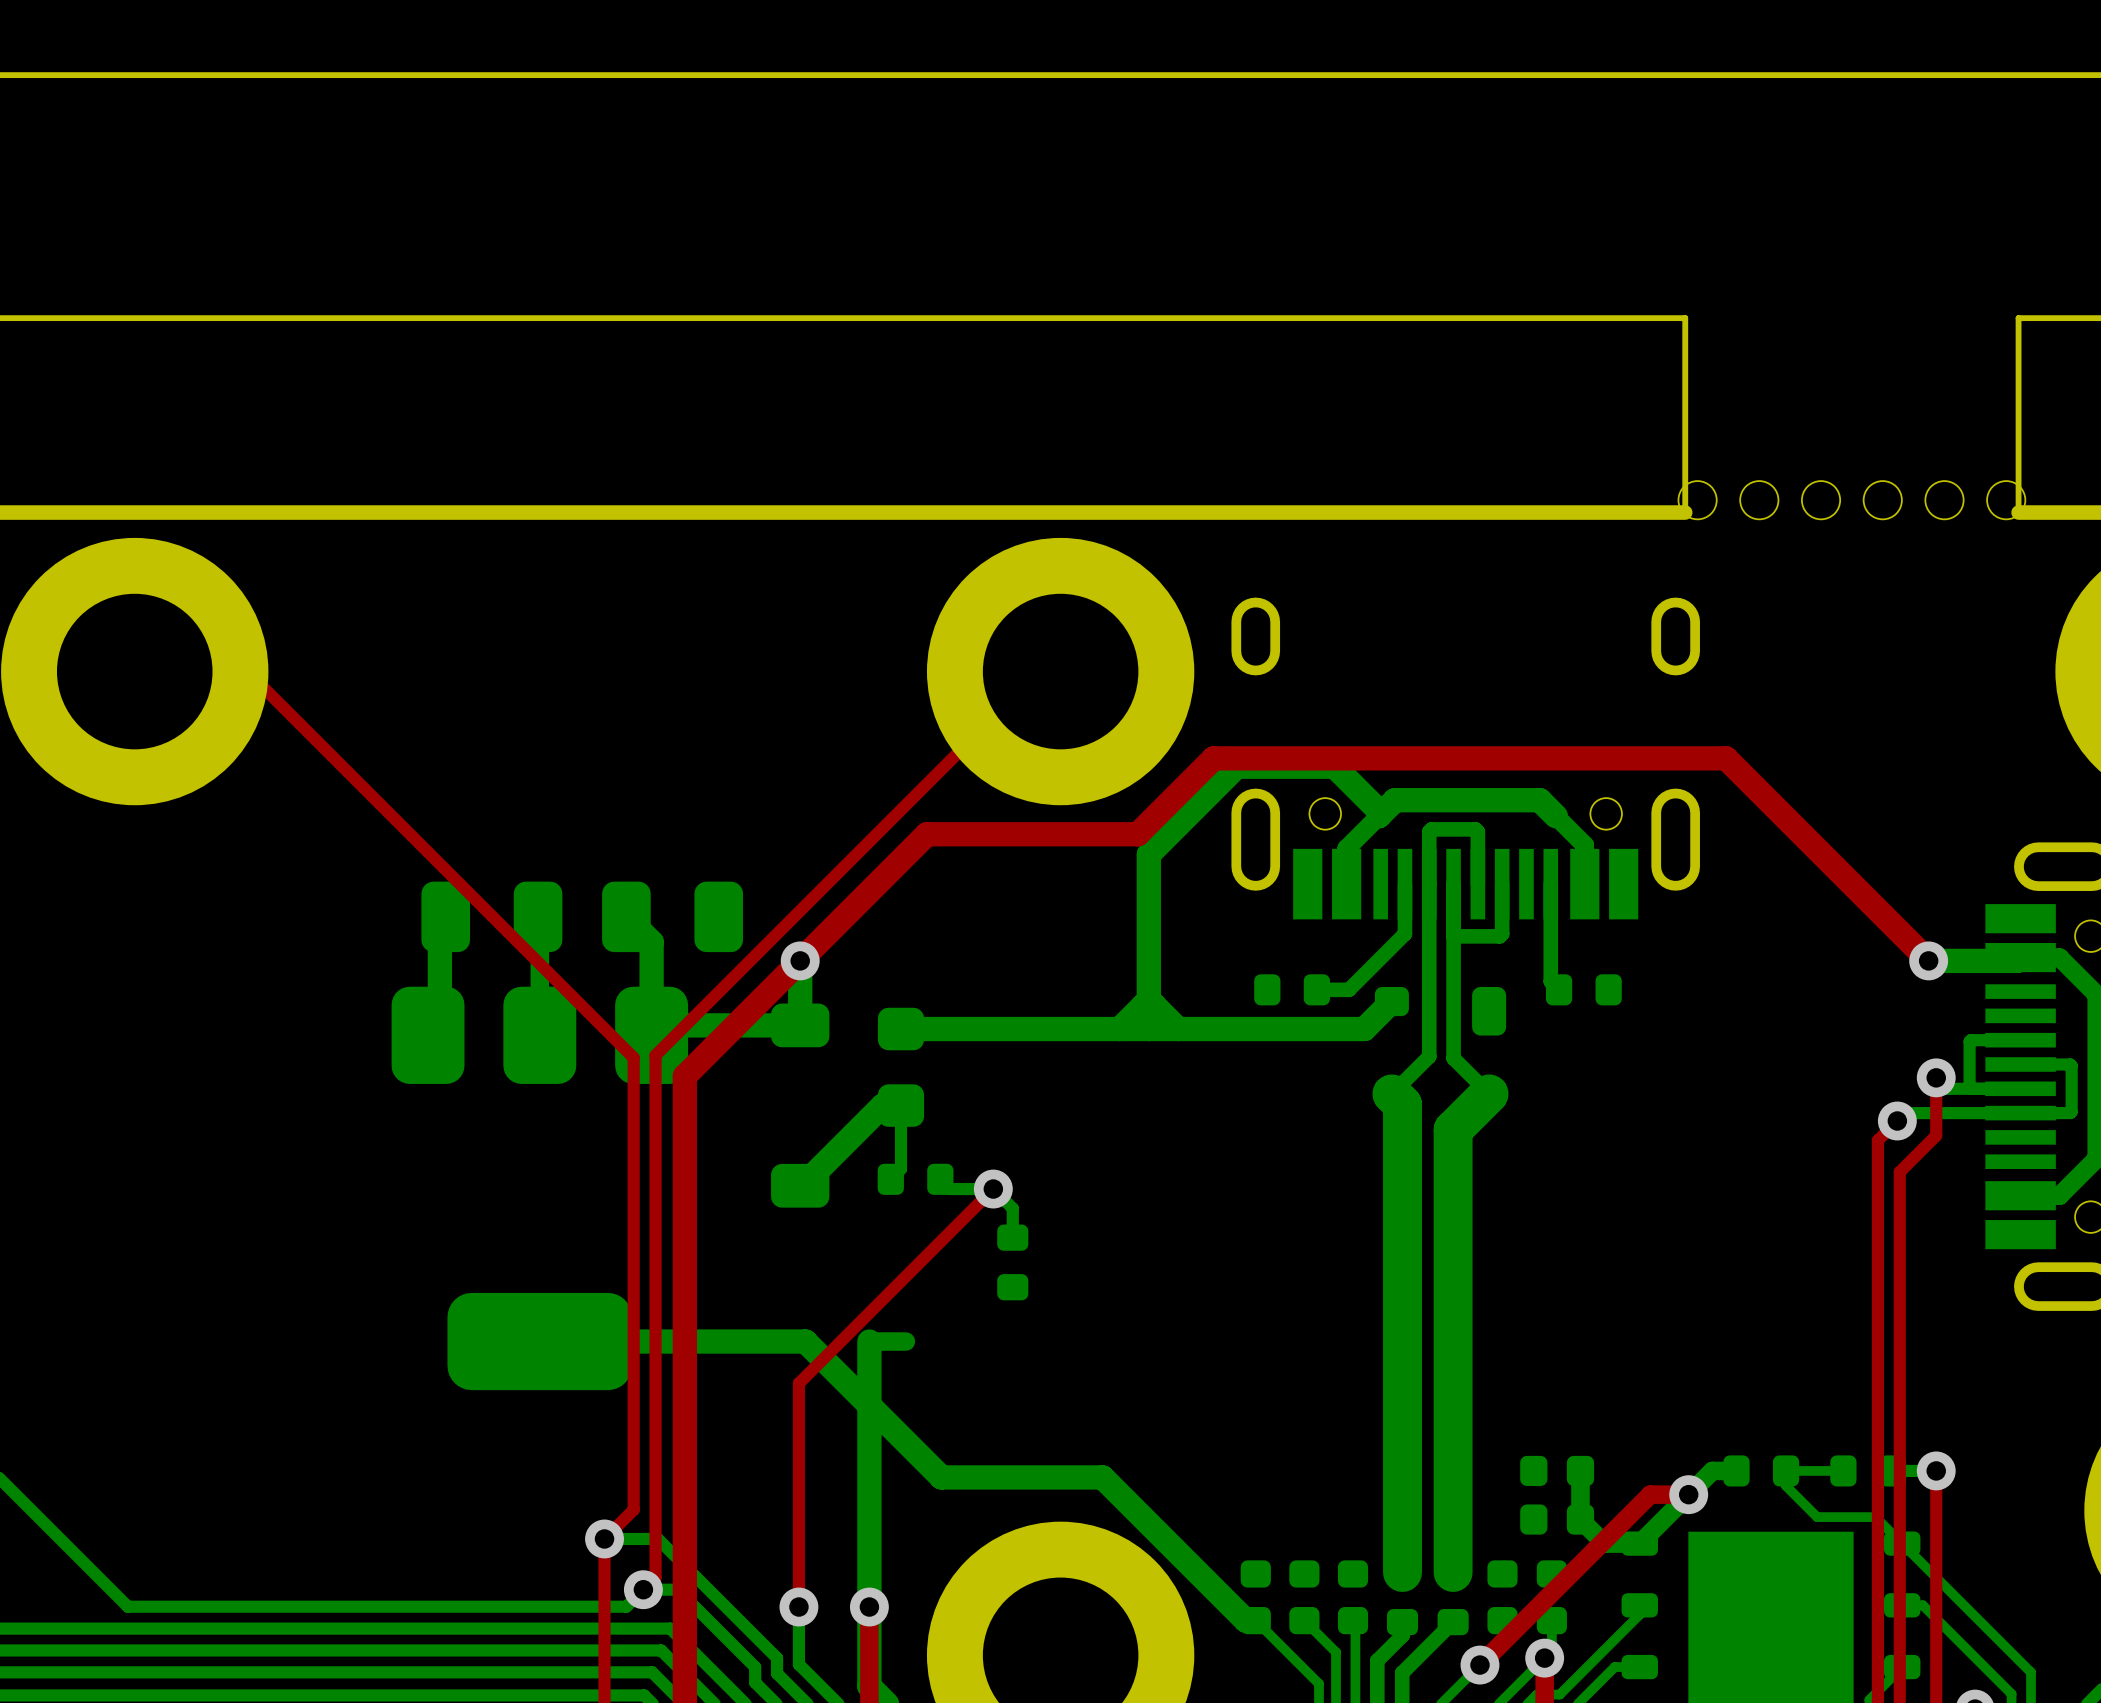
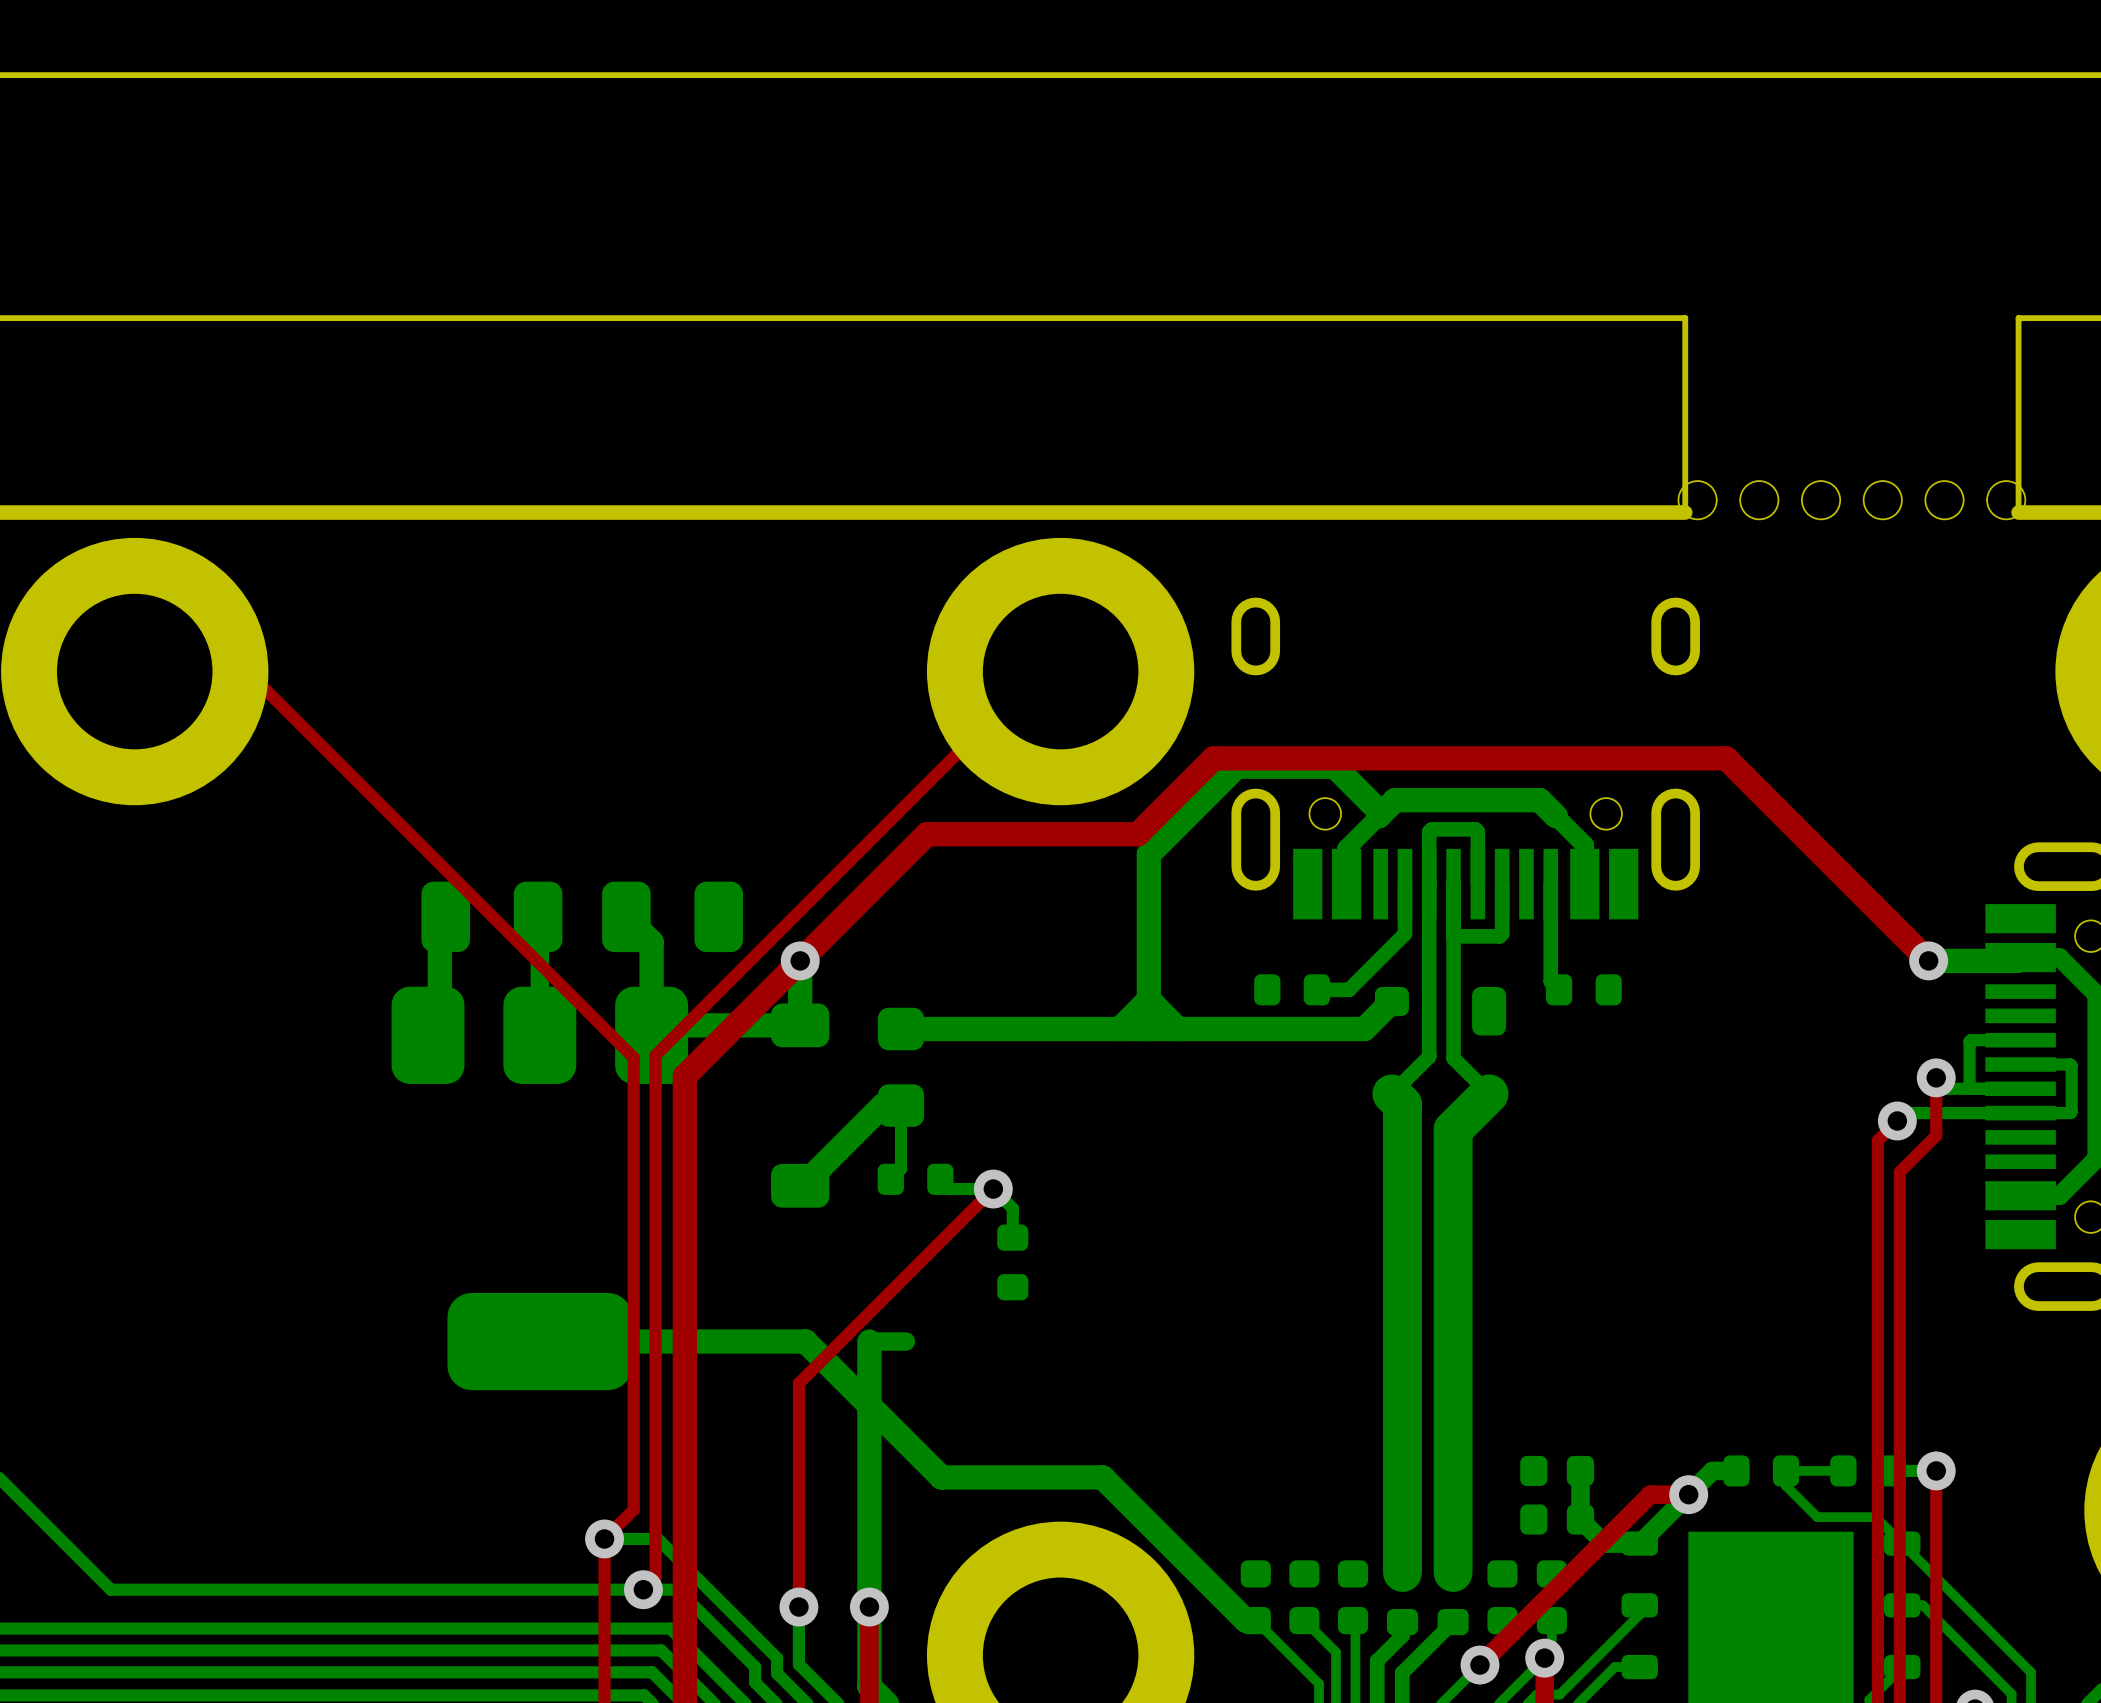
bottom track: (110, 1589) (127, 1606) (626, 1606) (643, 1589) -> (110, 1589) (643, 1589)

